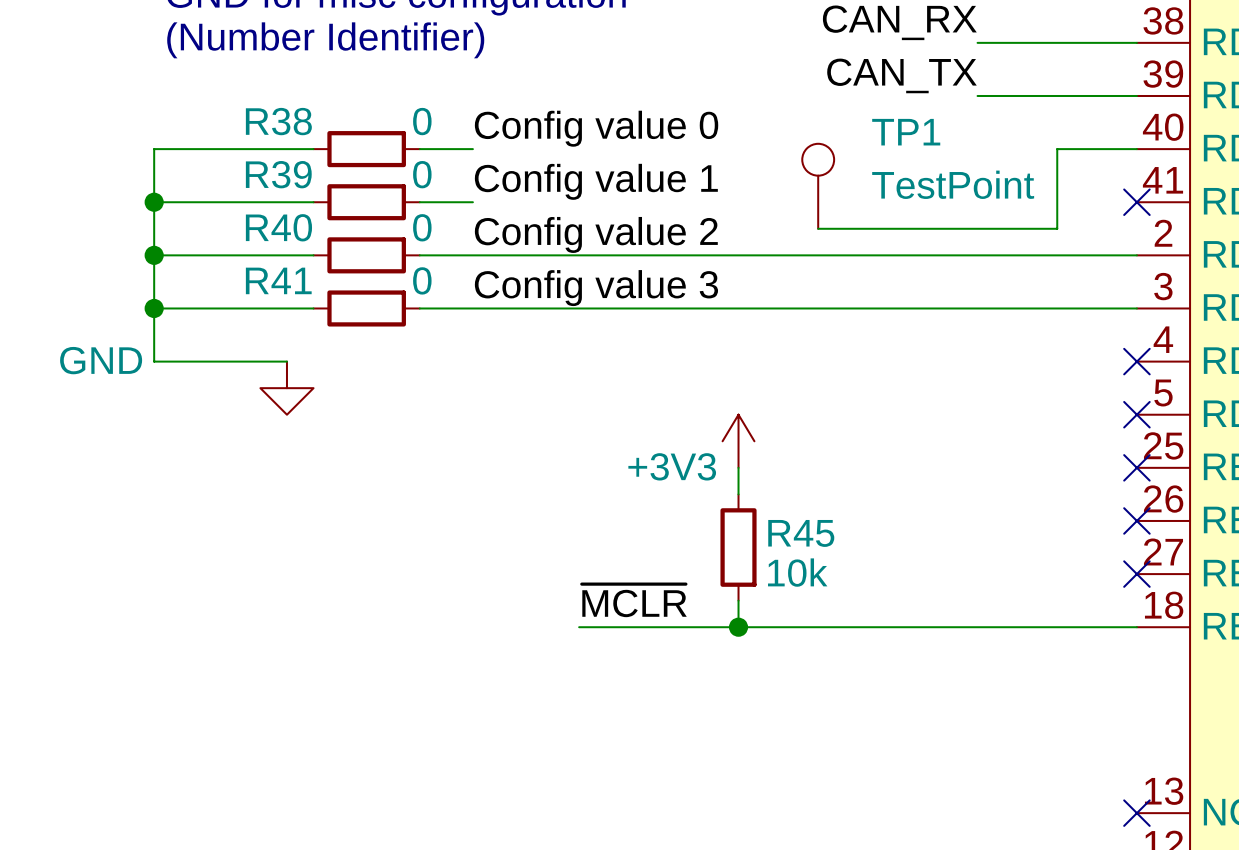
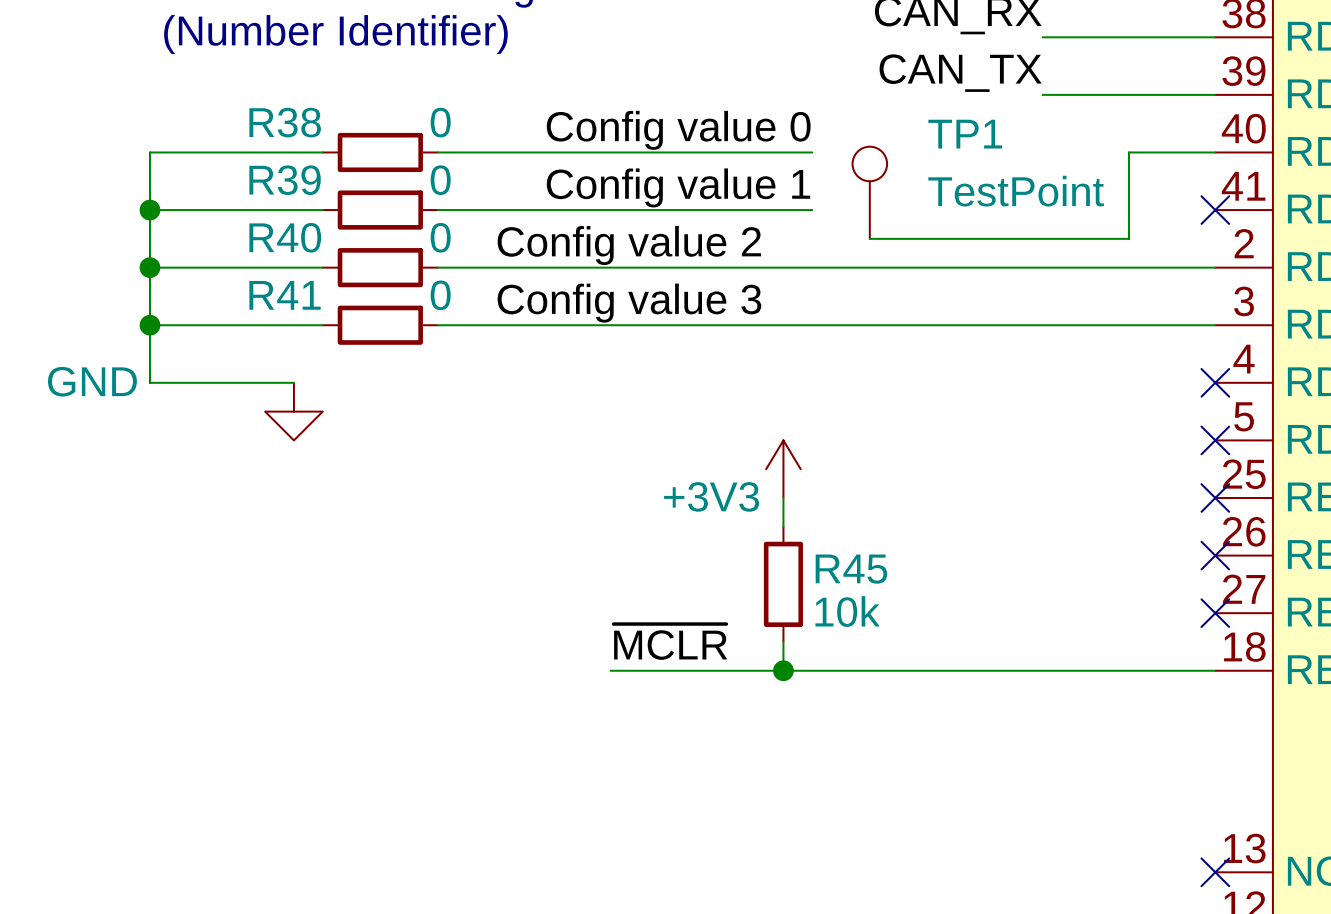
label position: Config value 0 (596, 128) -> Config value 0 (678, 130)
wire: none -> (495, 152) (812, 152)
label position: Config value 1 (596, 181) -> Config value 1 (678, 187)
wire: none -> (495, 210) (812, 210)

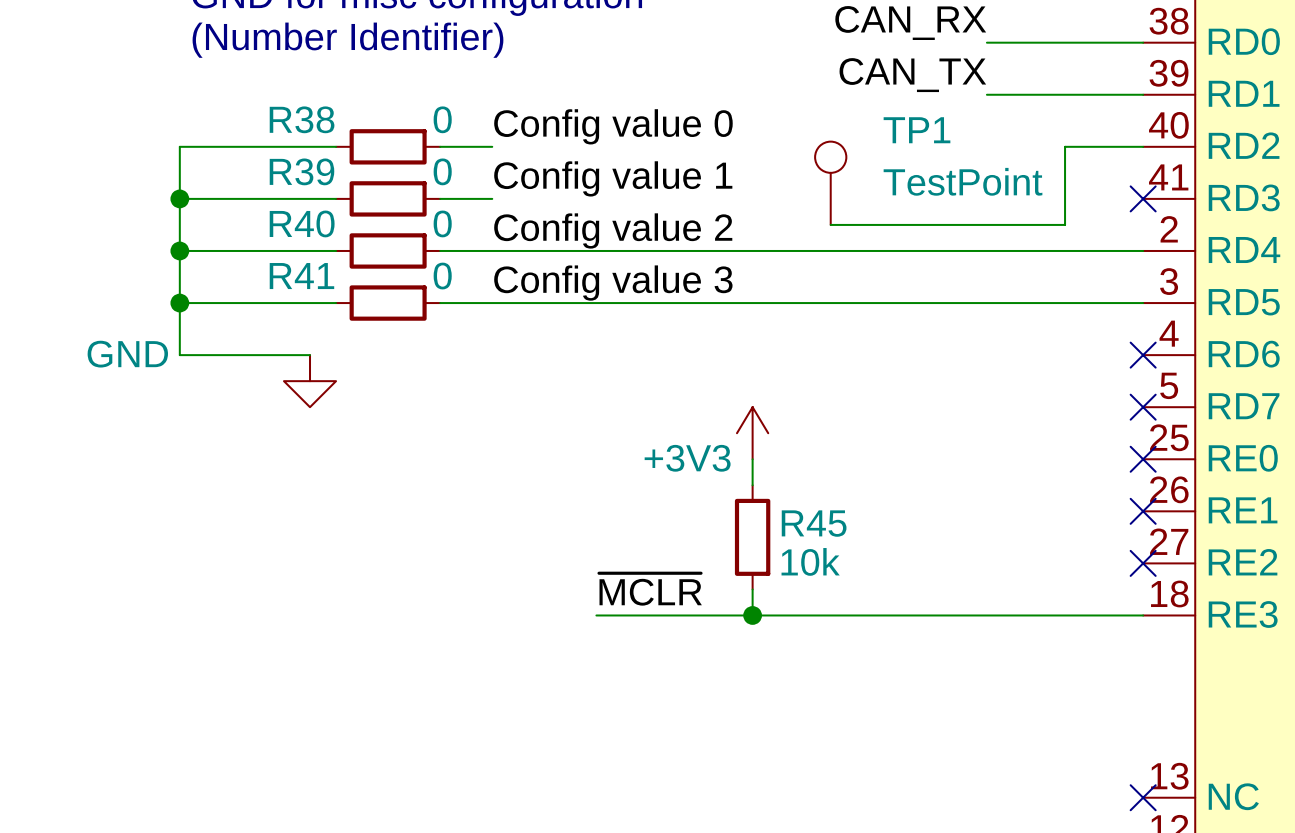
label position: Config value 0 (678, 130) -> Config value 0 (613, 126)
wire: (495, 152) (812, 152) -> none
label position: Config value 1 (678, 187) -> Config value 1 (613, 178)
wire: (495, 210) (812, 210) -> none

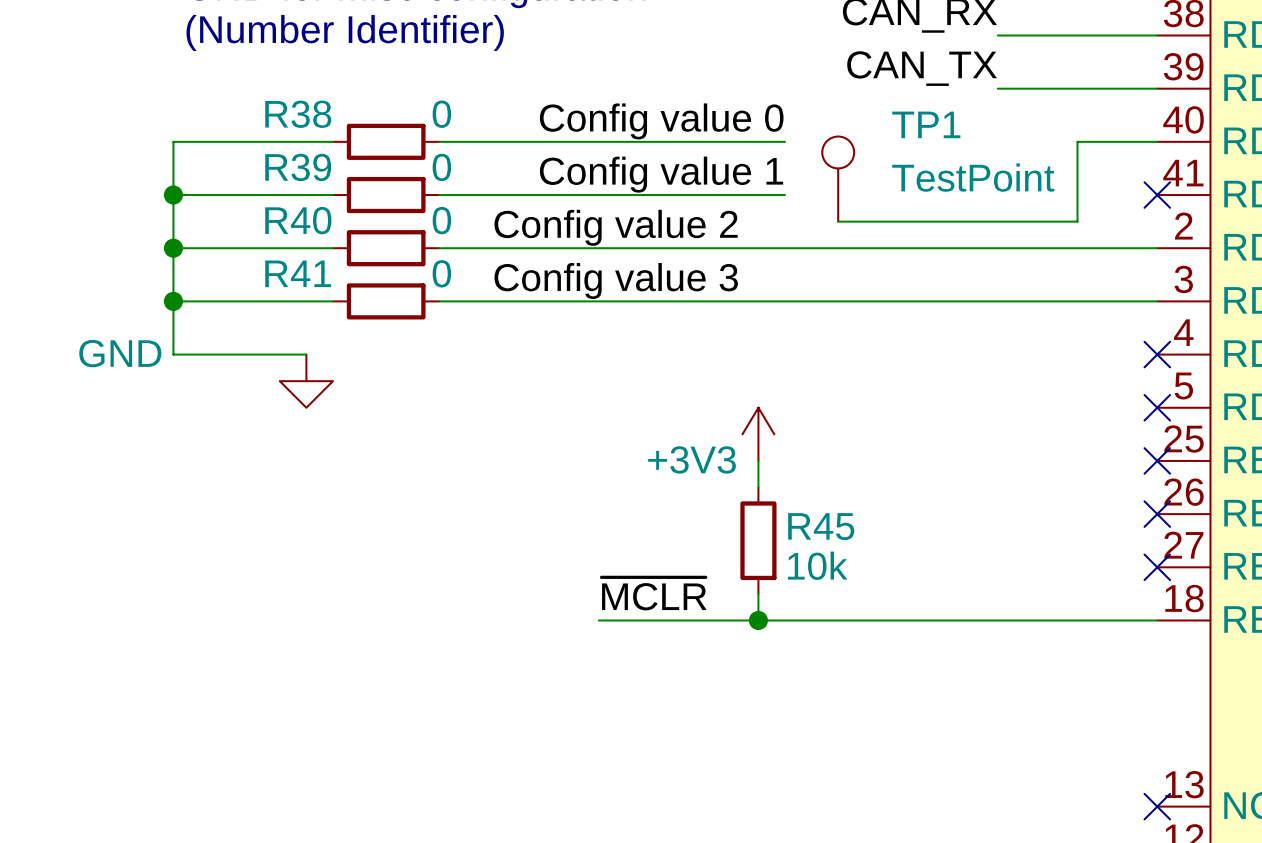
label position: Config value 0 (613, 126) -> Config value 0 (661, 121)
wire: none -> (492, 141) (785, 141)
label position: Config value 1 (613, 178) -> Config value 1 (661, 174)
wire: none -> (492, 195) (785, 195)

